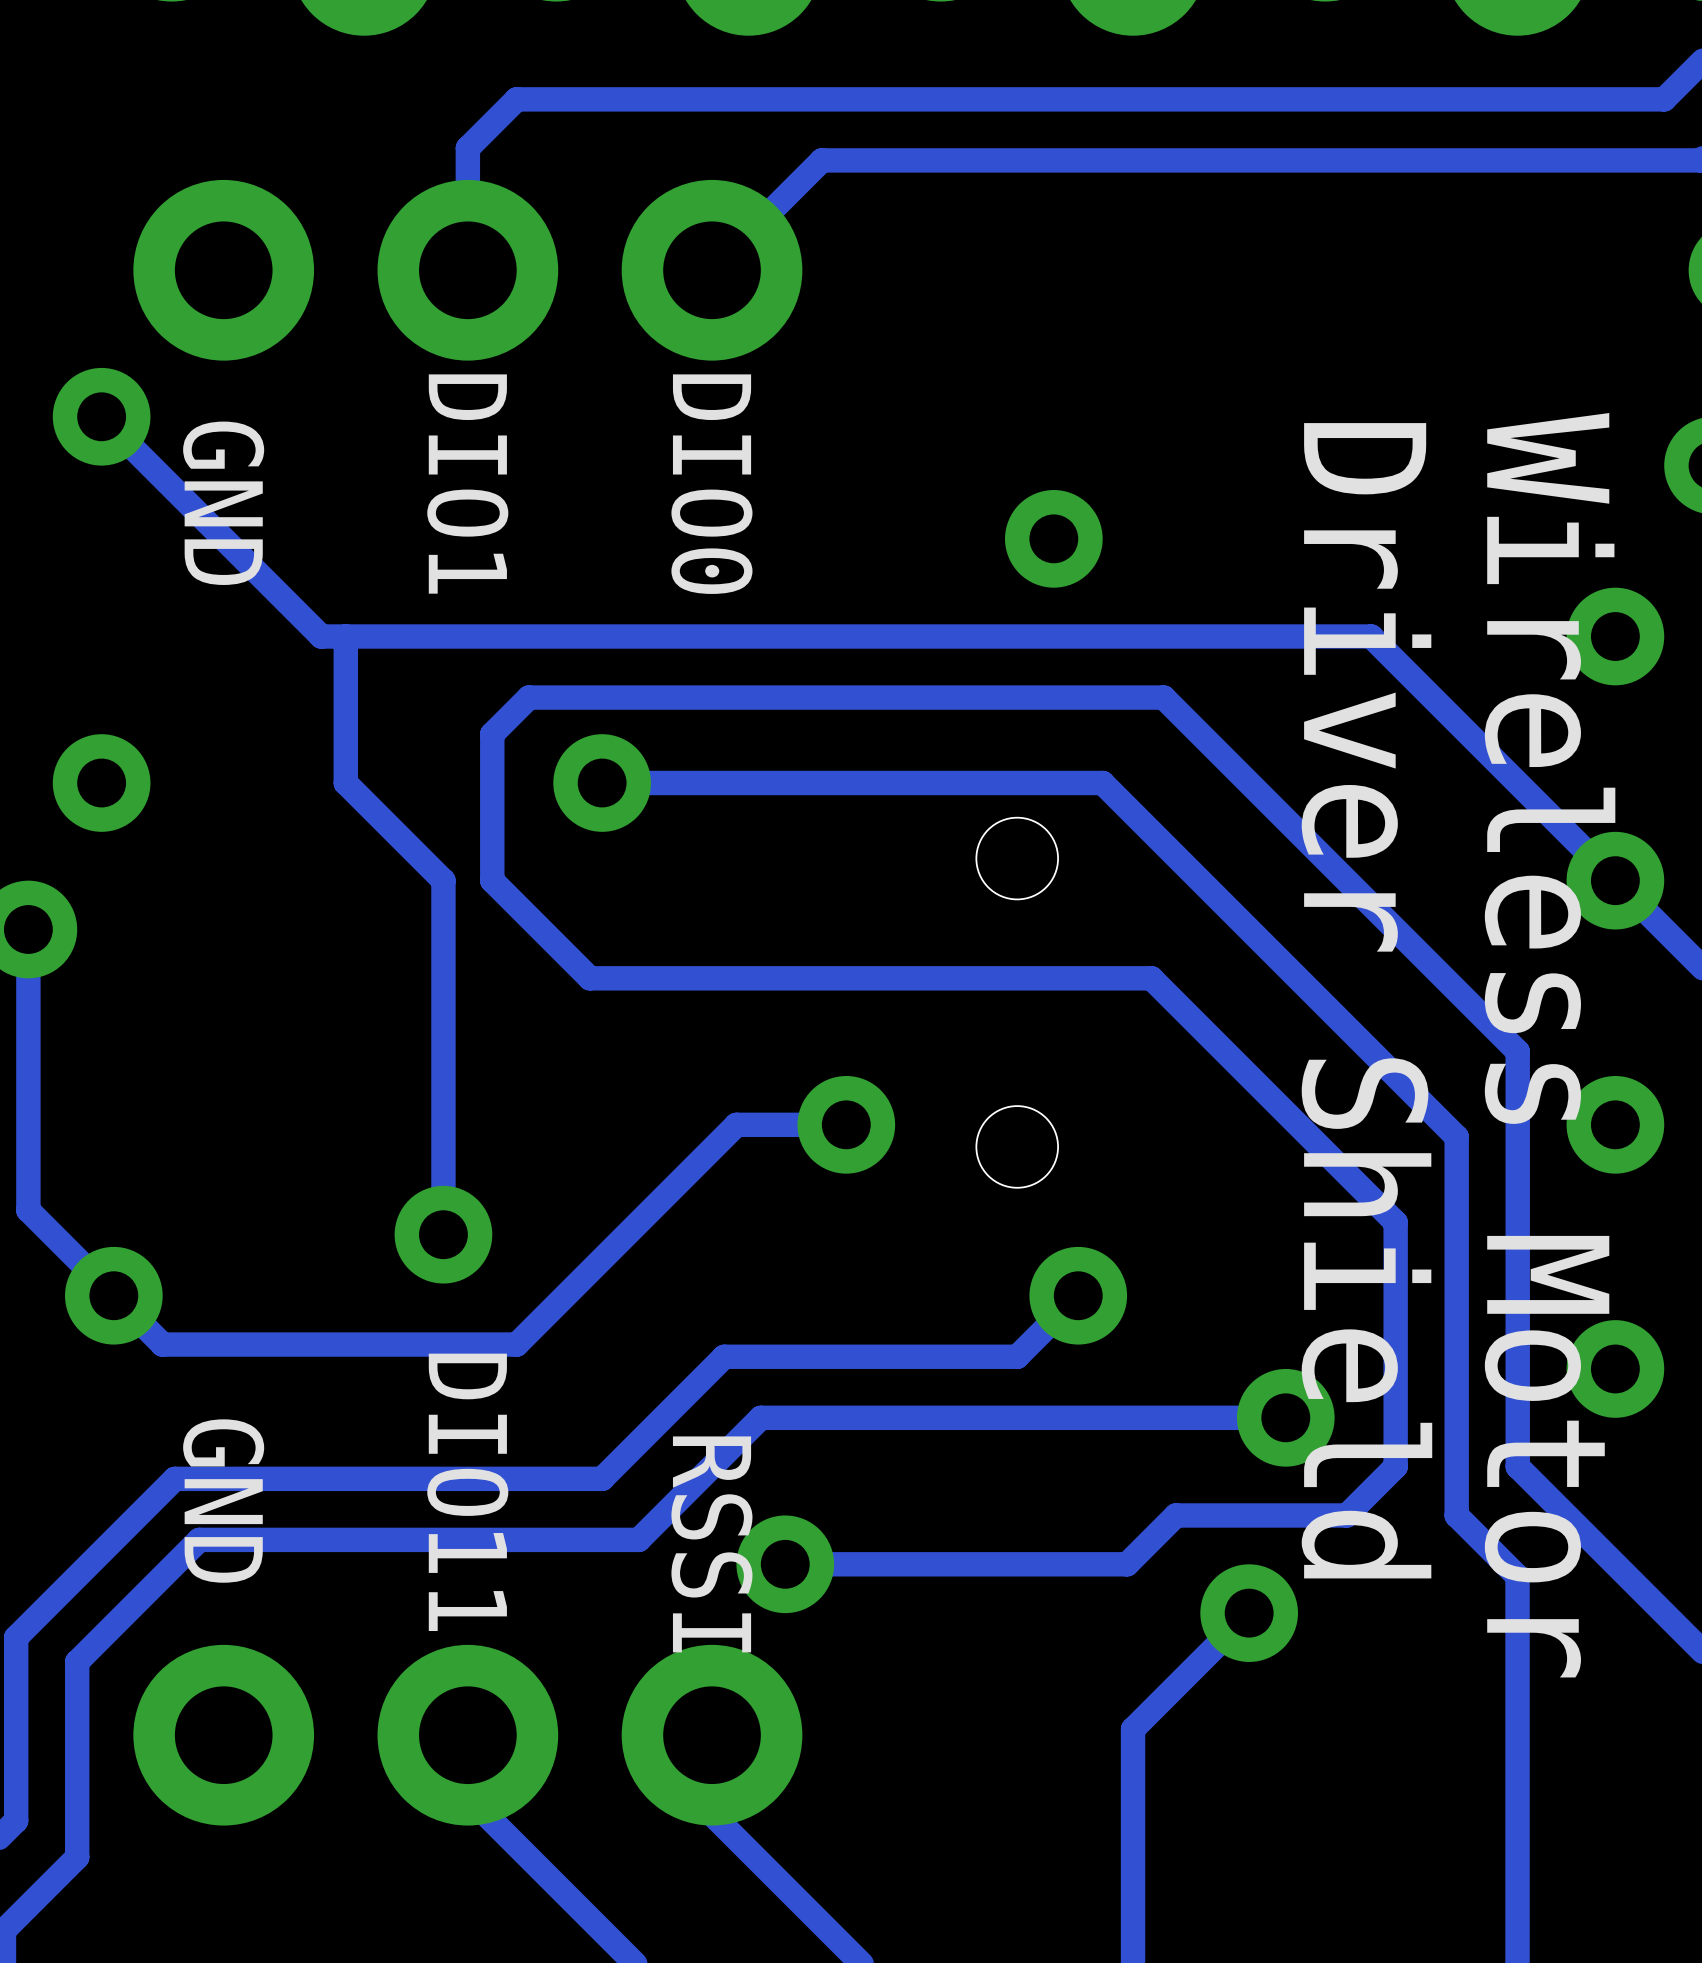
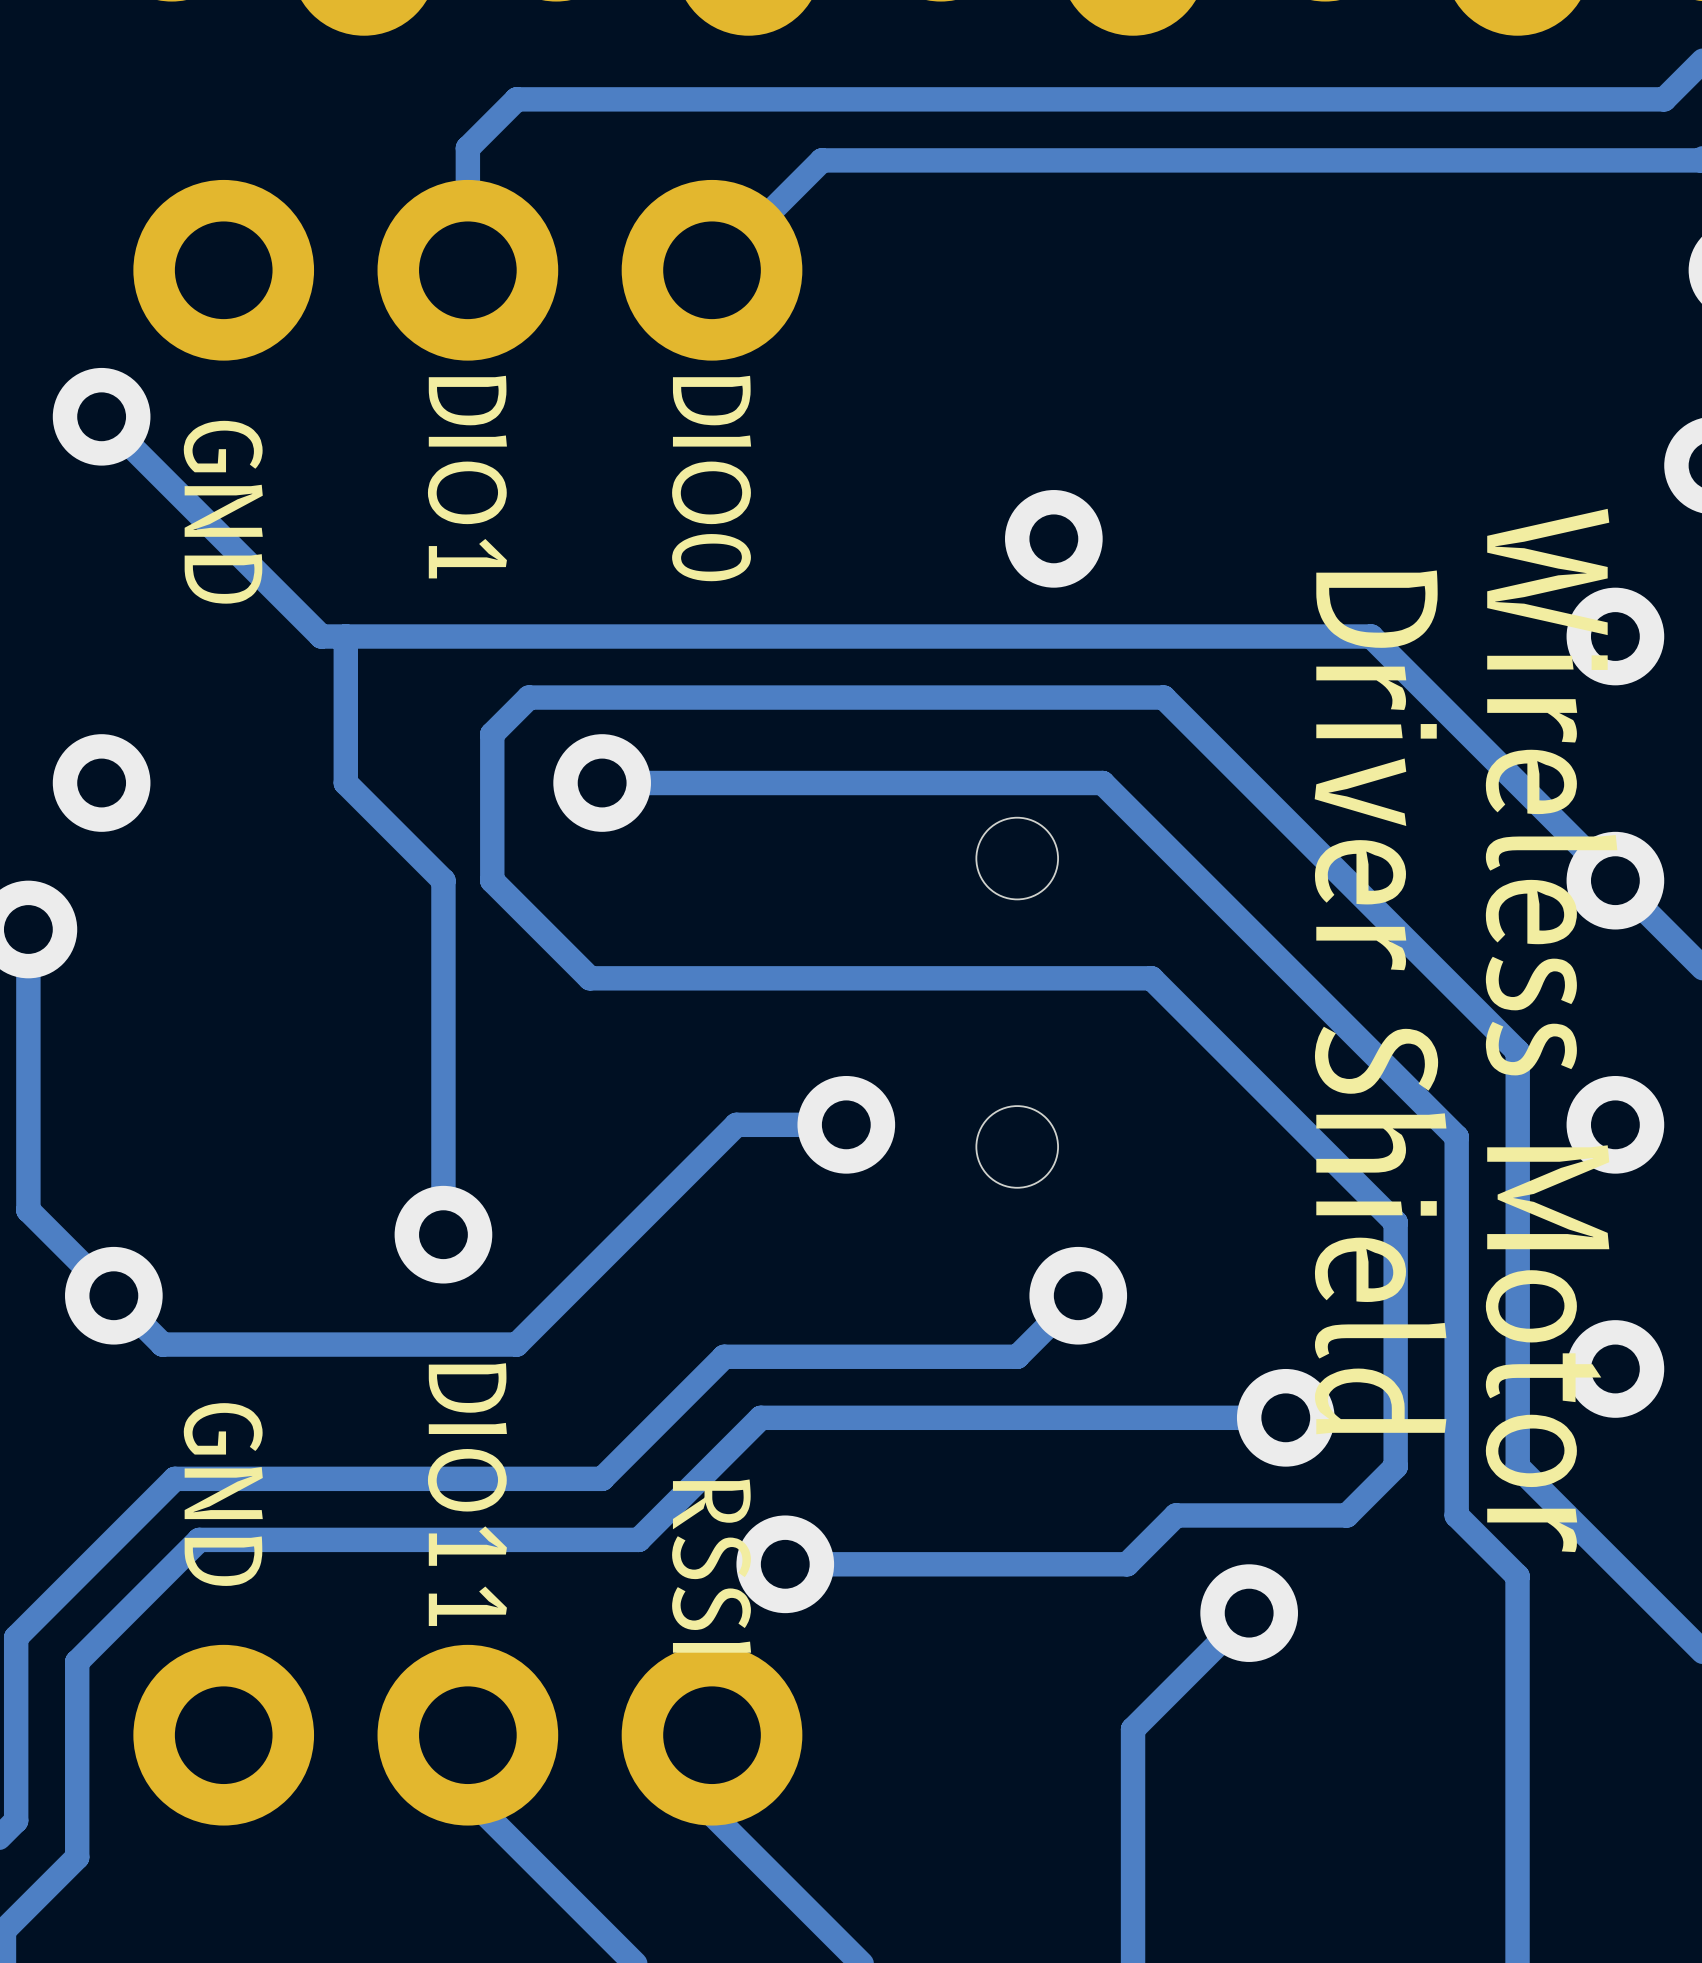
text position: Driver Shield (1366, 1000) -> Driver Shield (1380, 1002)

